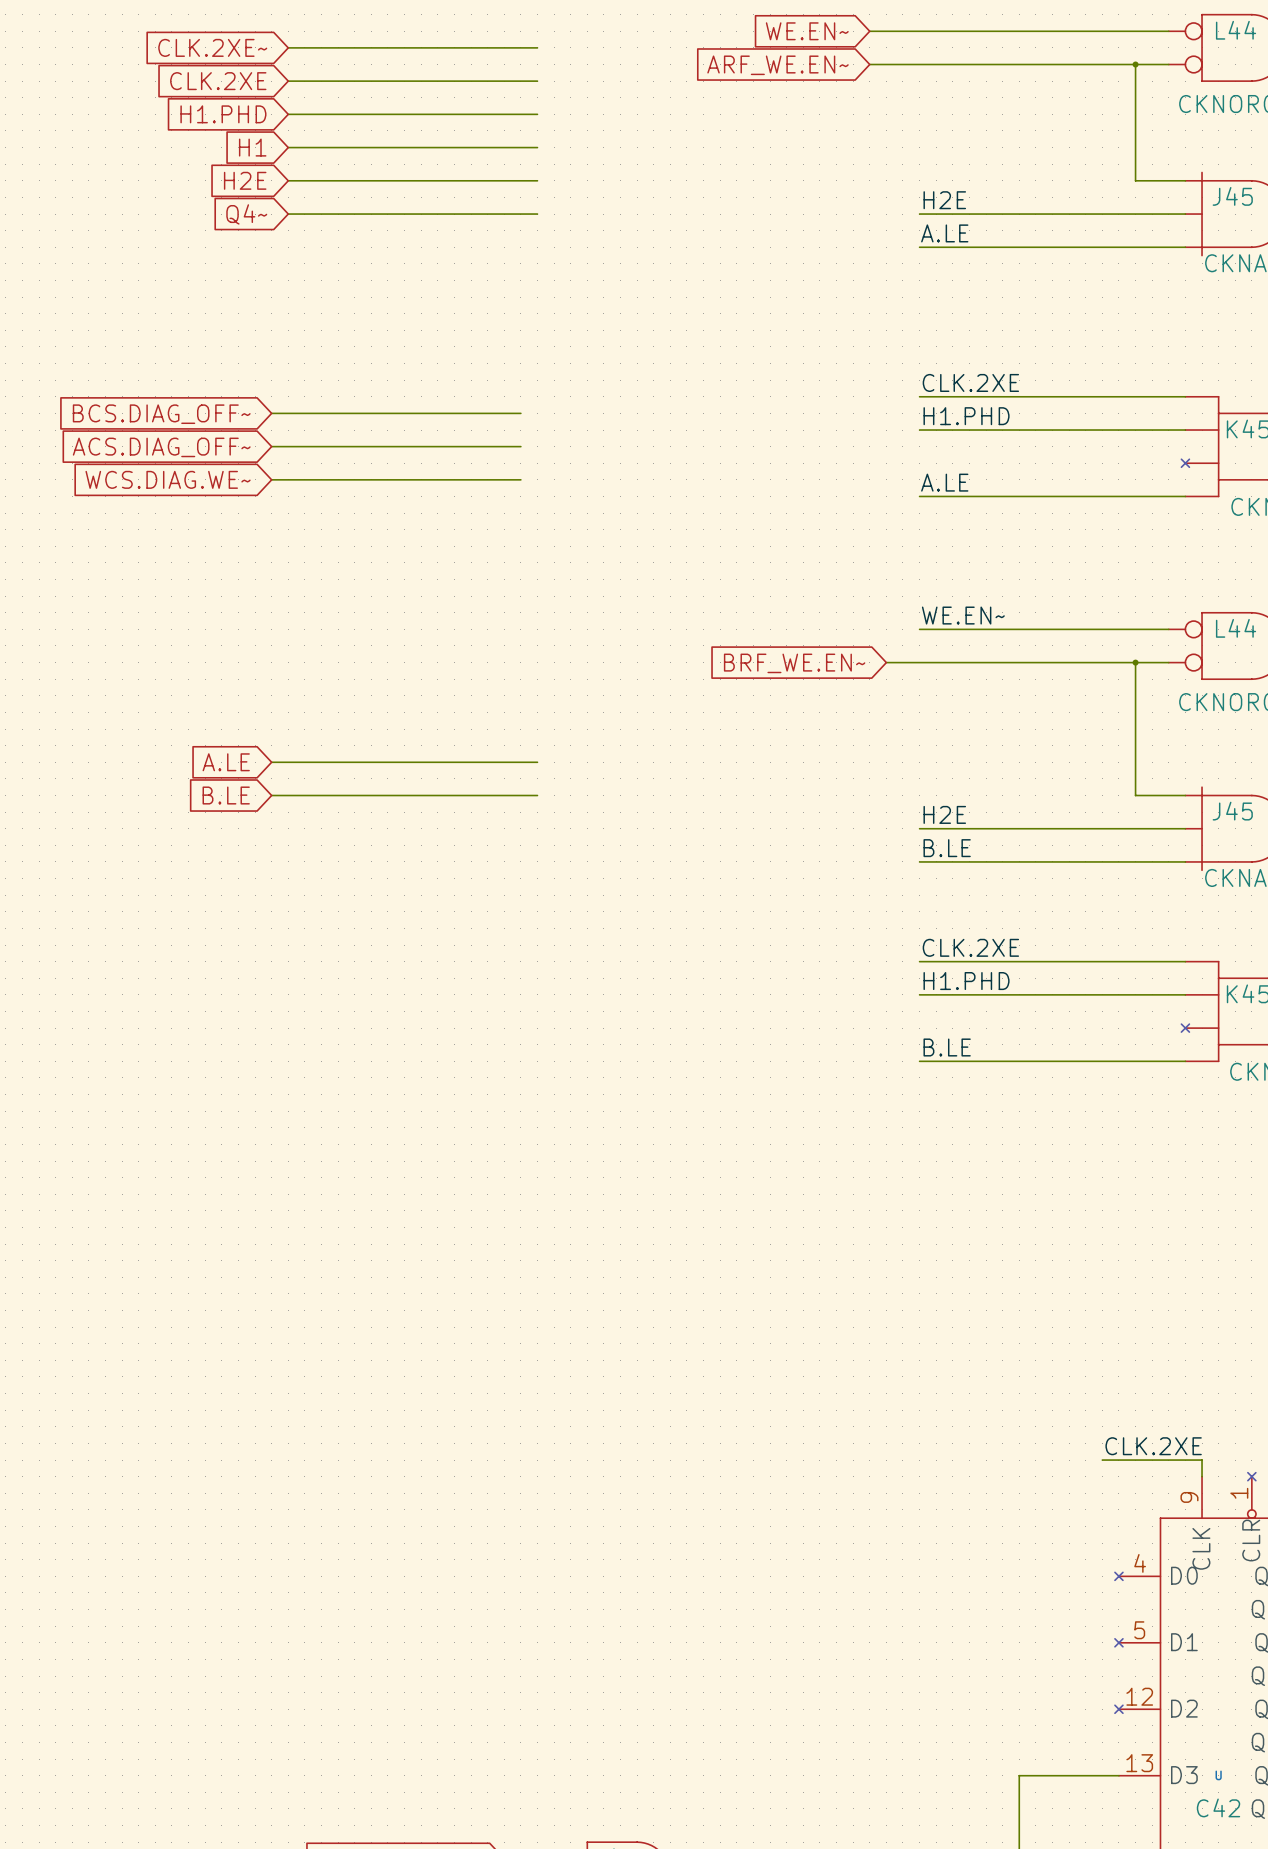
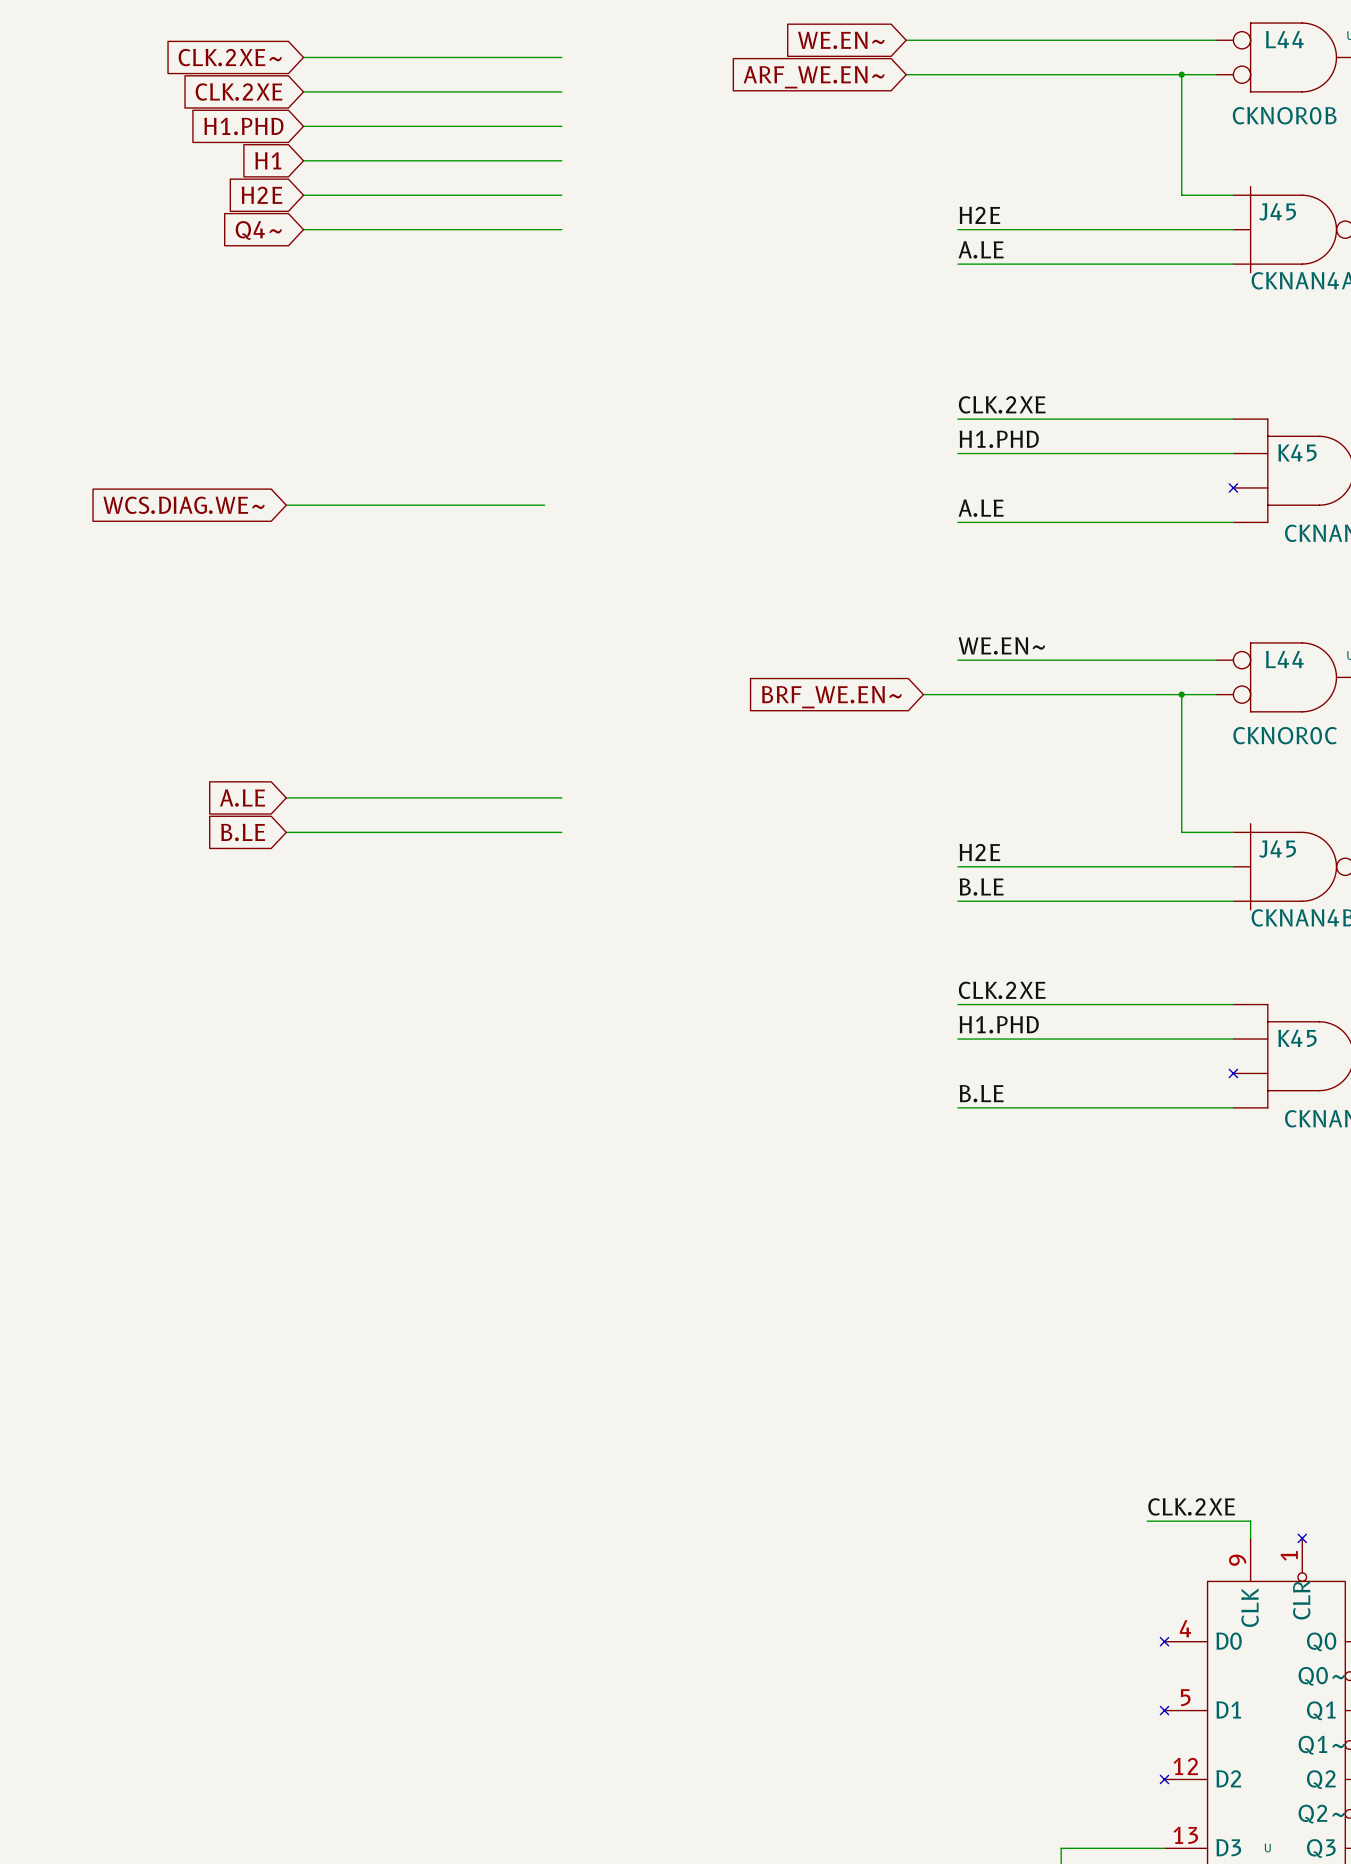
wire: (271, 413) (520, 413) -> none
global label: BCS.DIAG_OFF~ (161, 414) -> none
wire: (271, 446) (520, 446) -> none
global label: ACS.DIAG_OFF~ (161, 447) -> none

